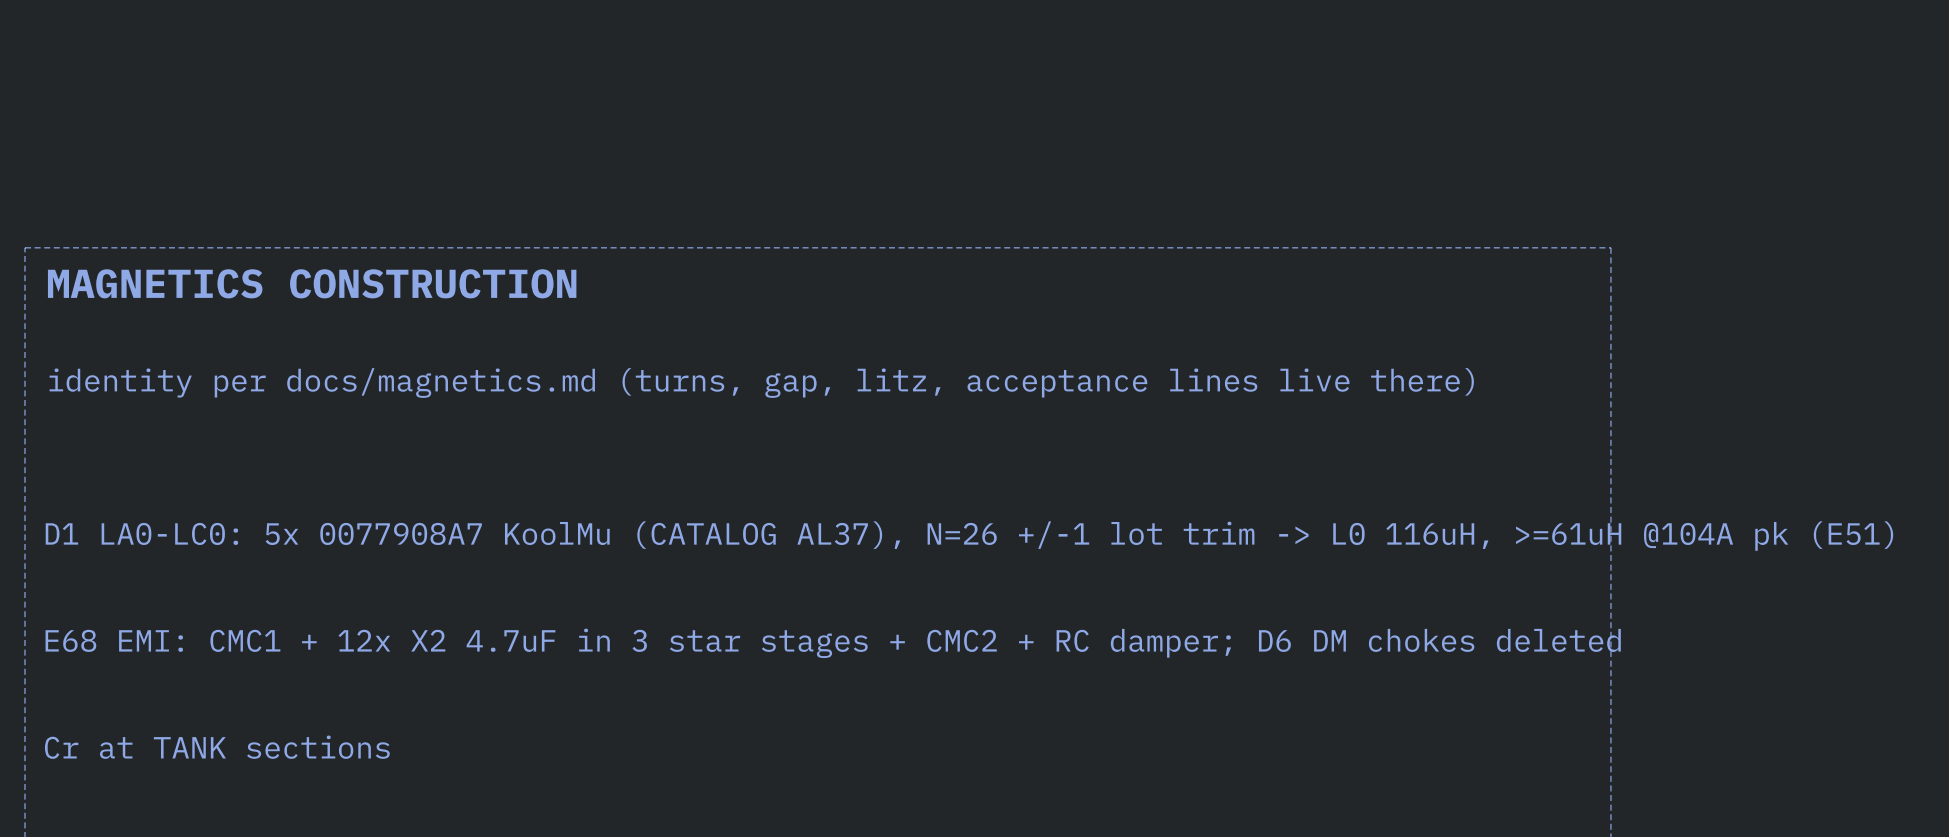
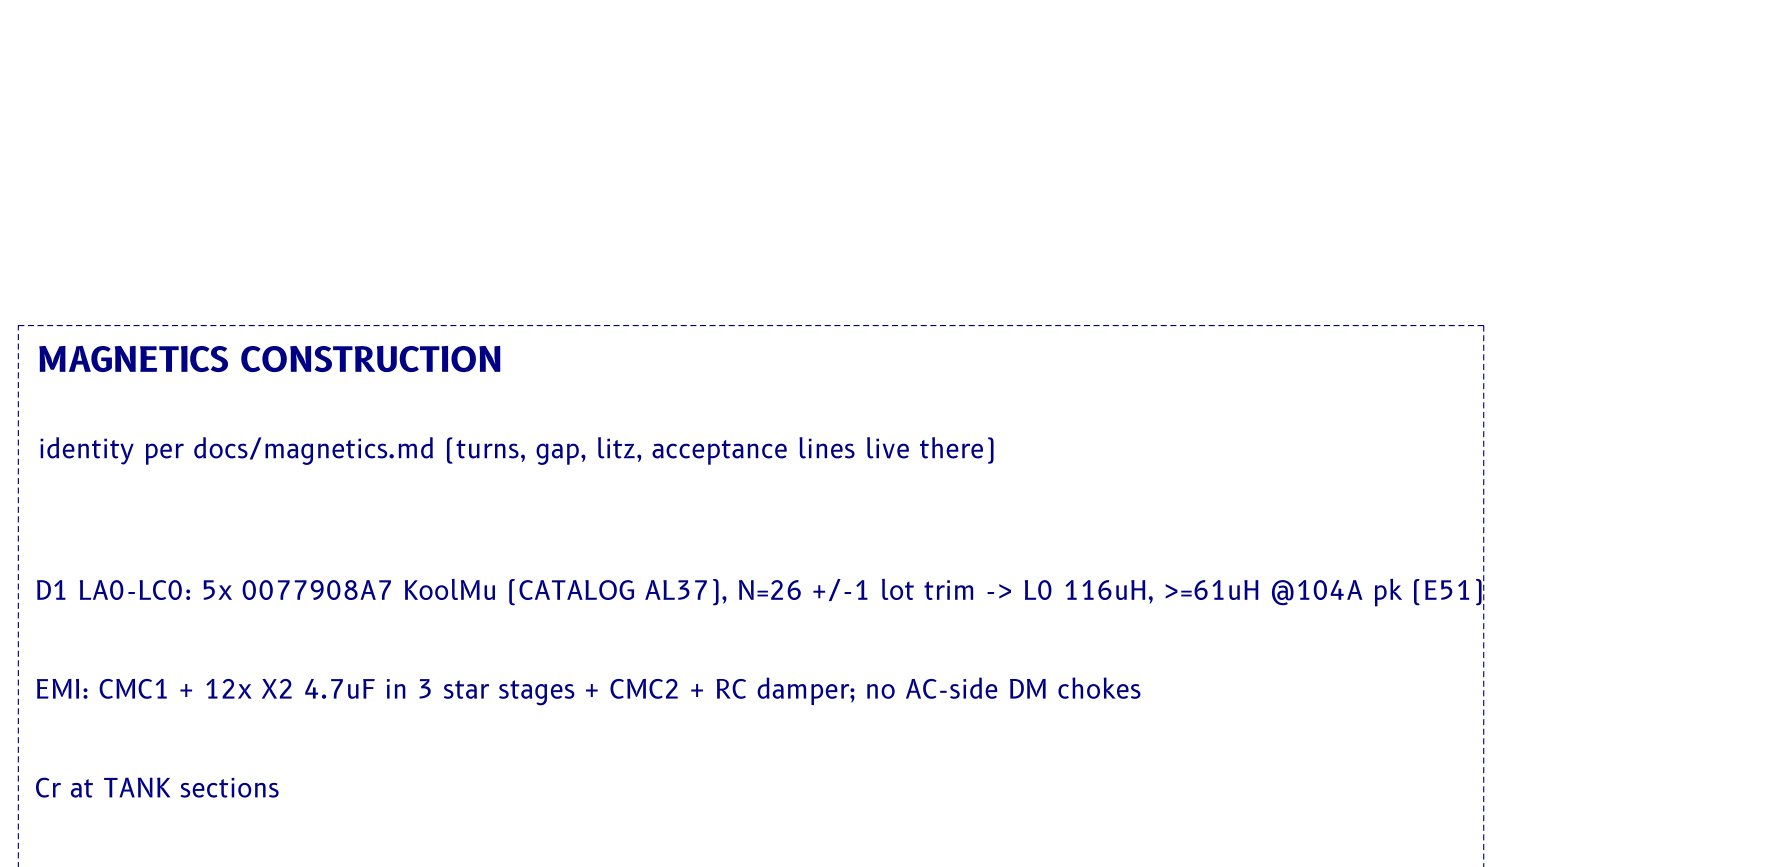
text: E68 EMI: CMC1 + 12x X2 4.7uF in 3 star stages + CMC2 + RC damper; D6 DM chokes deleted (833, 643) -> EMI: CMC1 + 12x X2 4.7uF in 3 star stages + CMC2 + RC damper; no AC-side DM chokes (588, 691)

